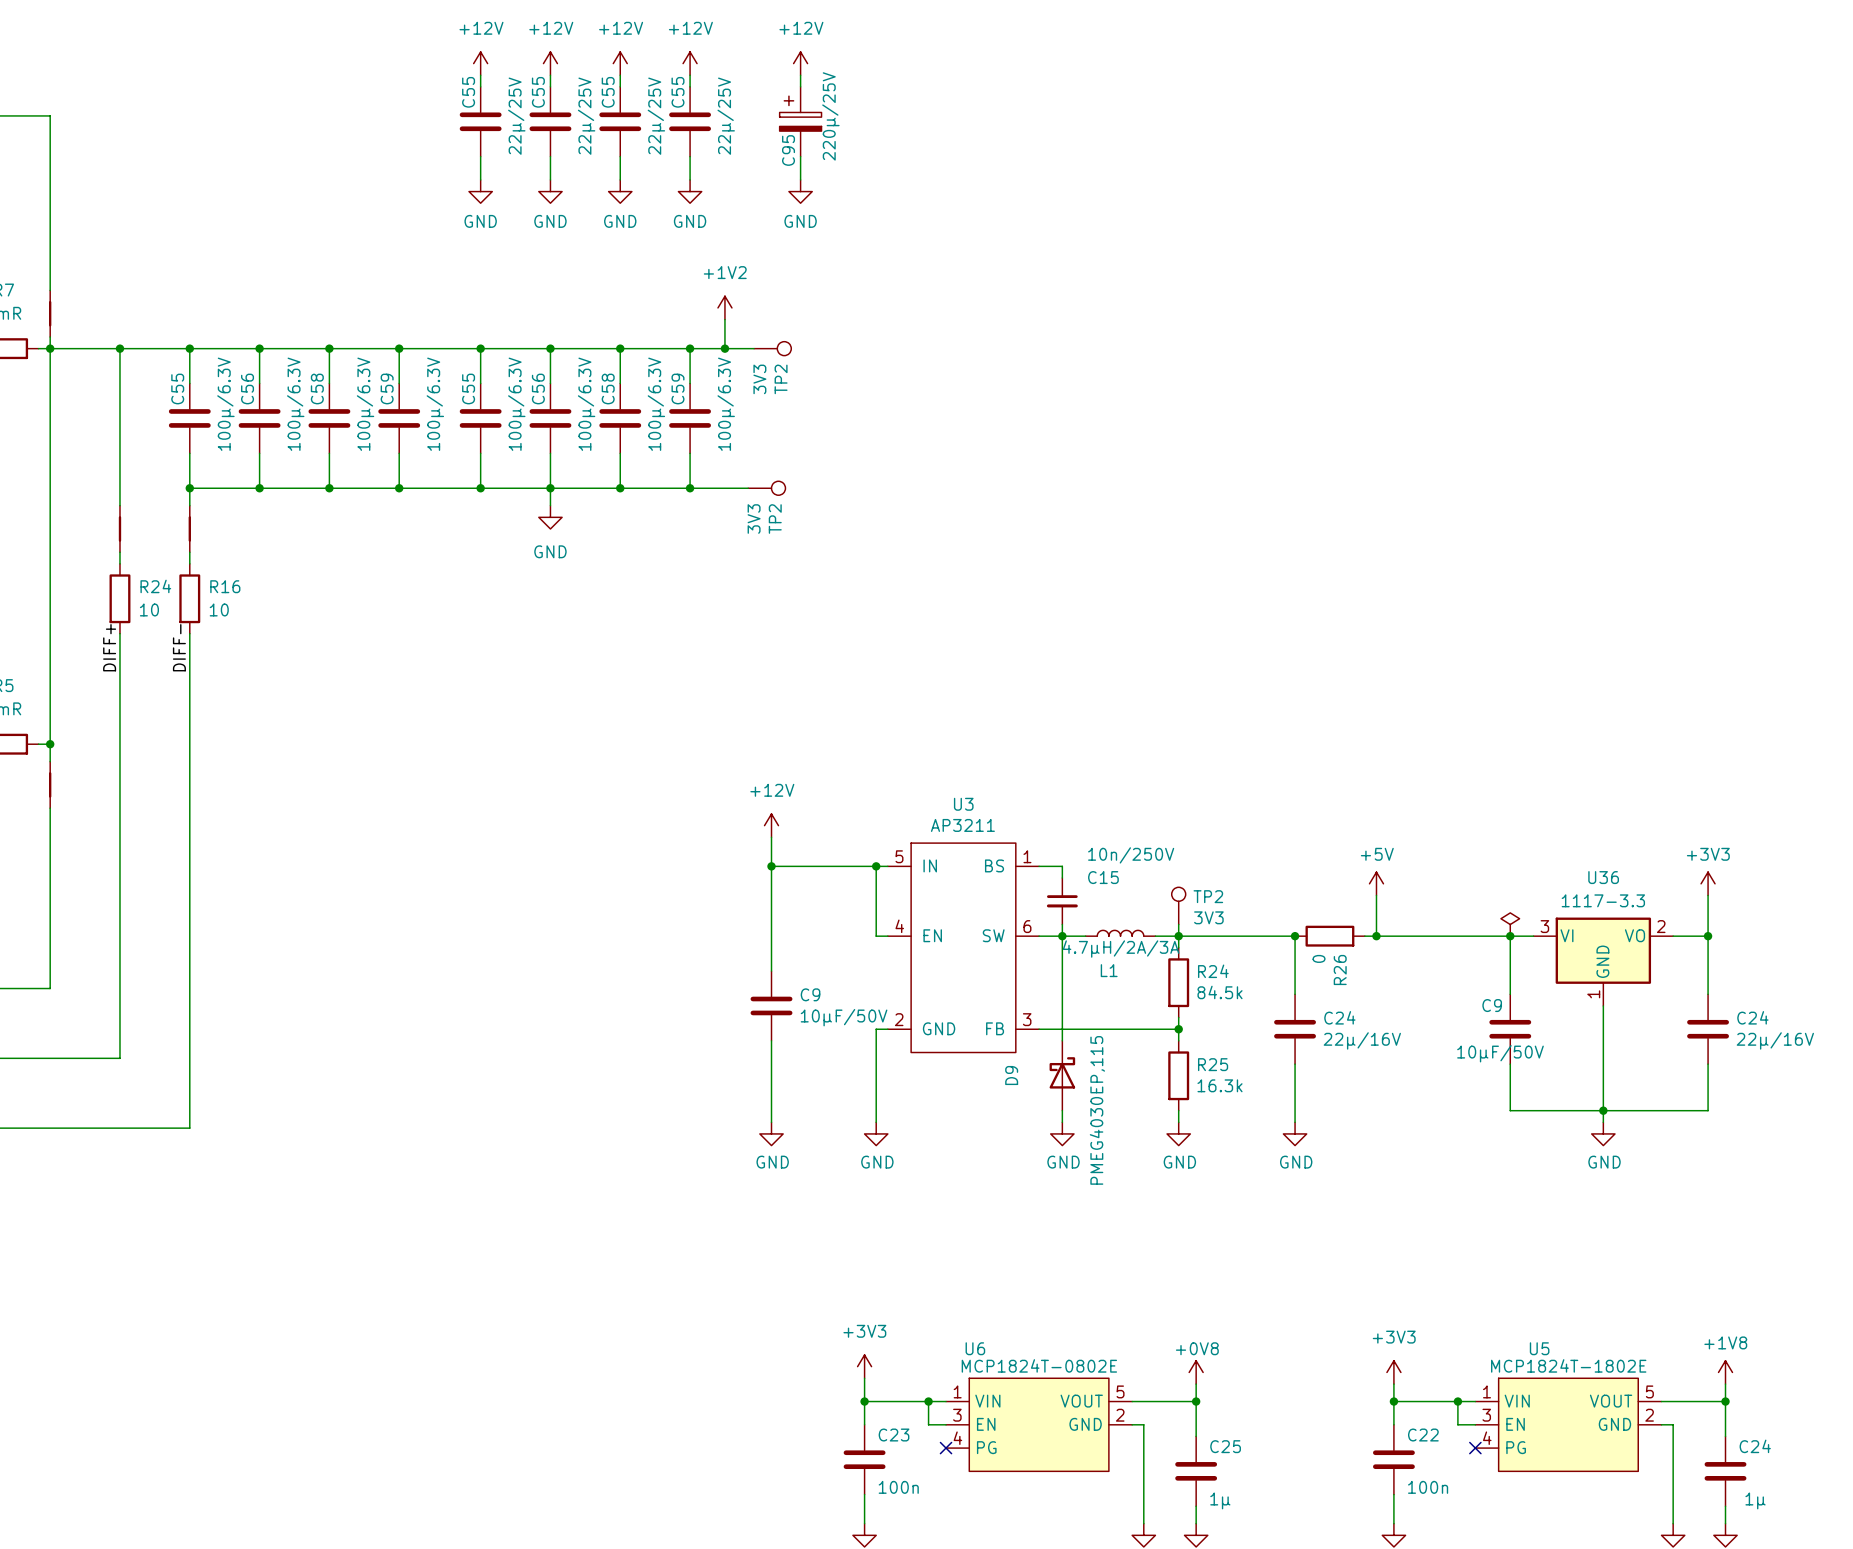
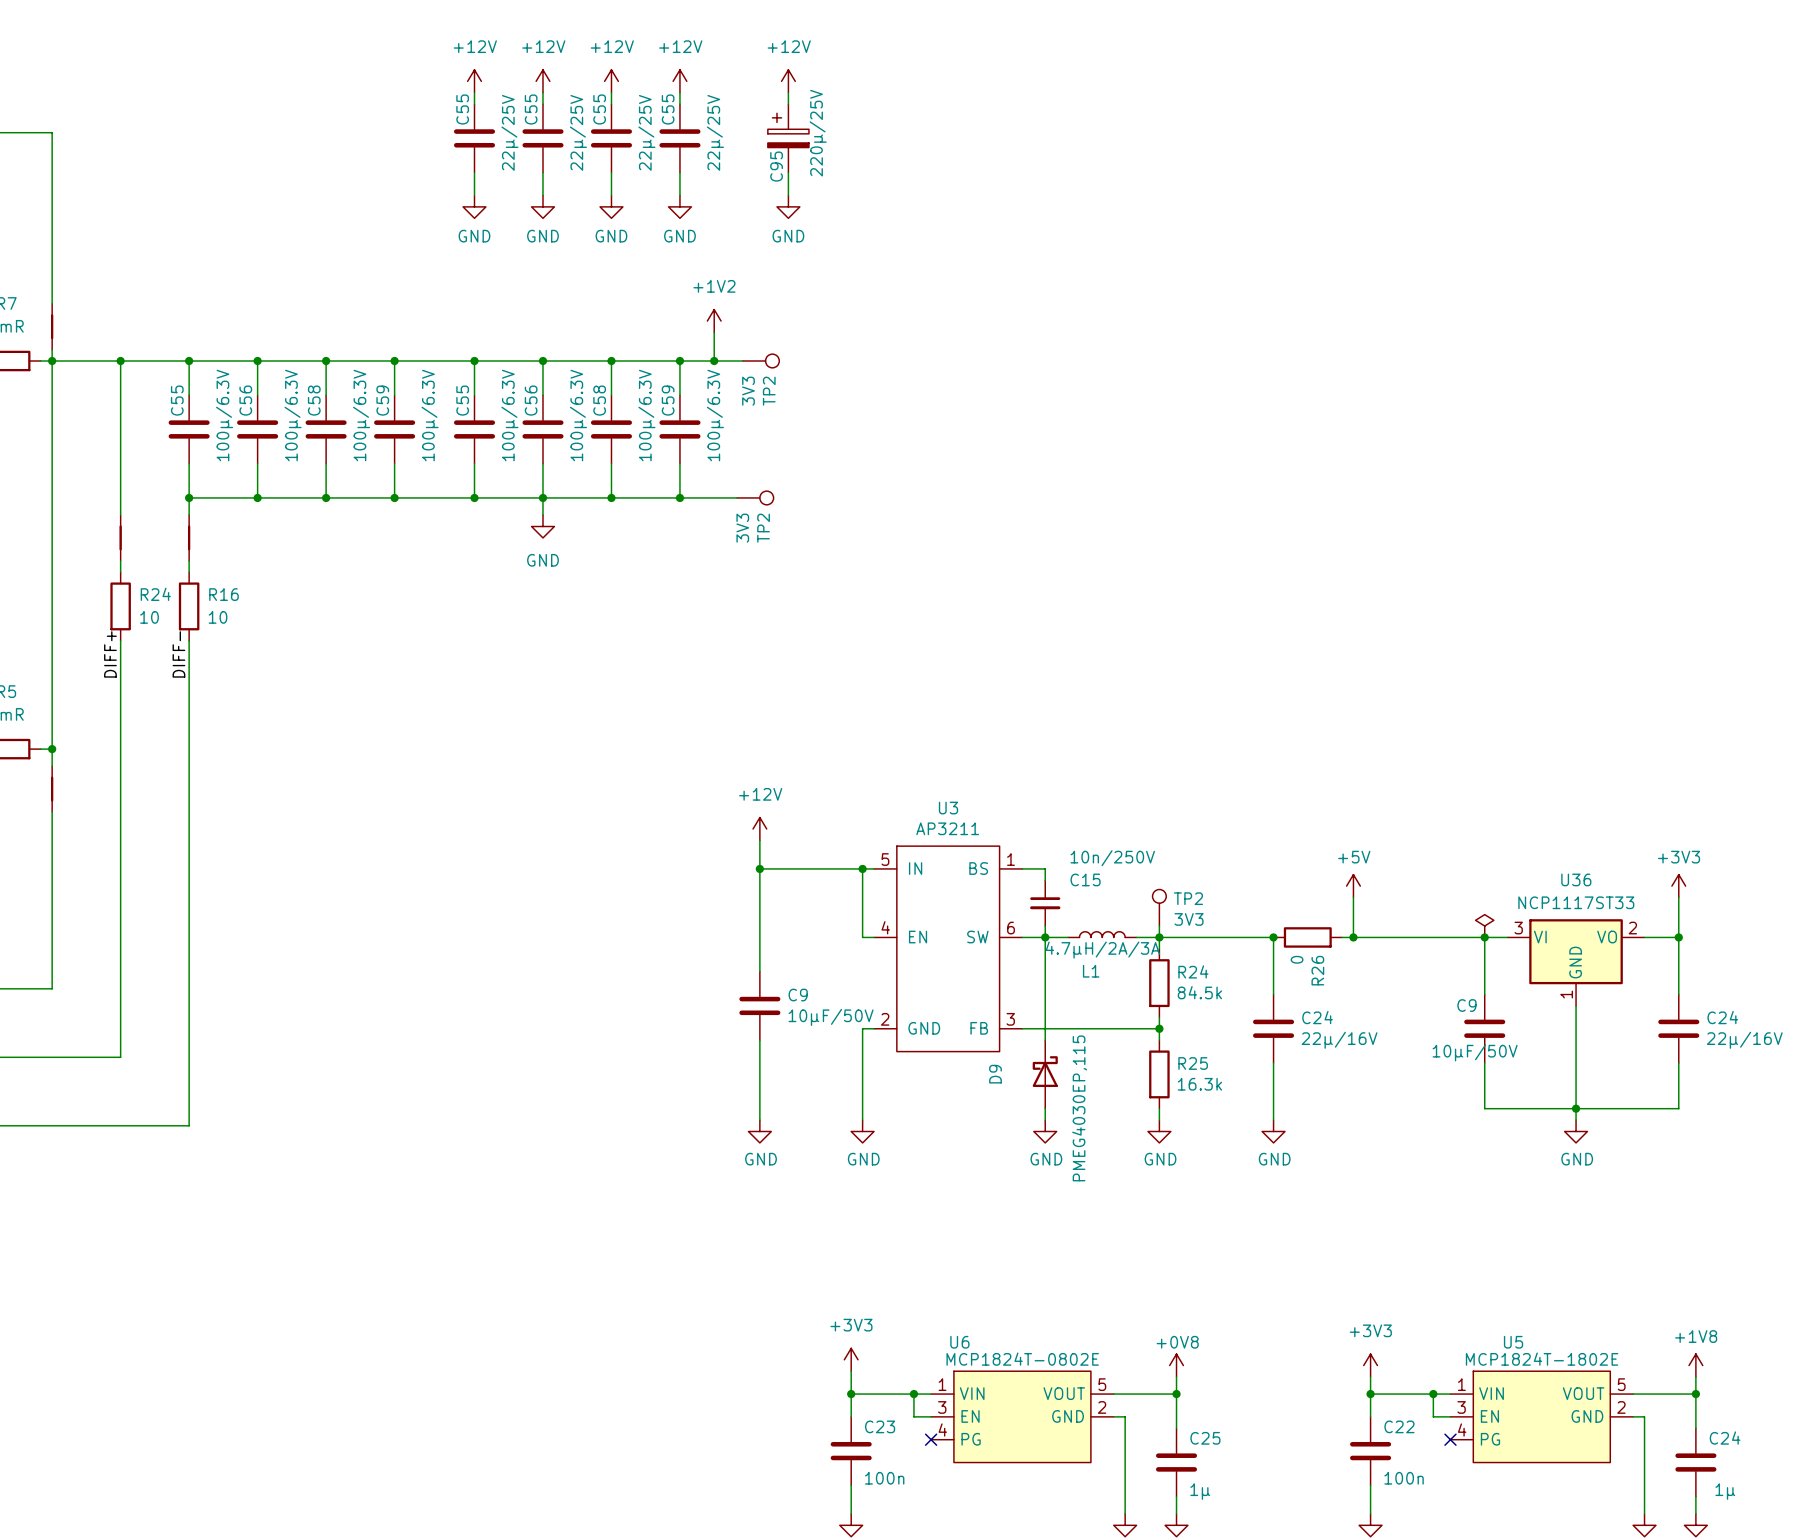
U36 value: 1117-3.3 (1603, 900) -> NCP1117ST33 (1576, 902)

